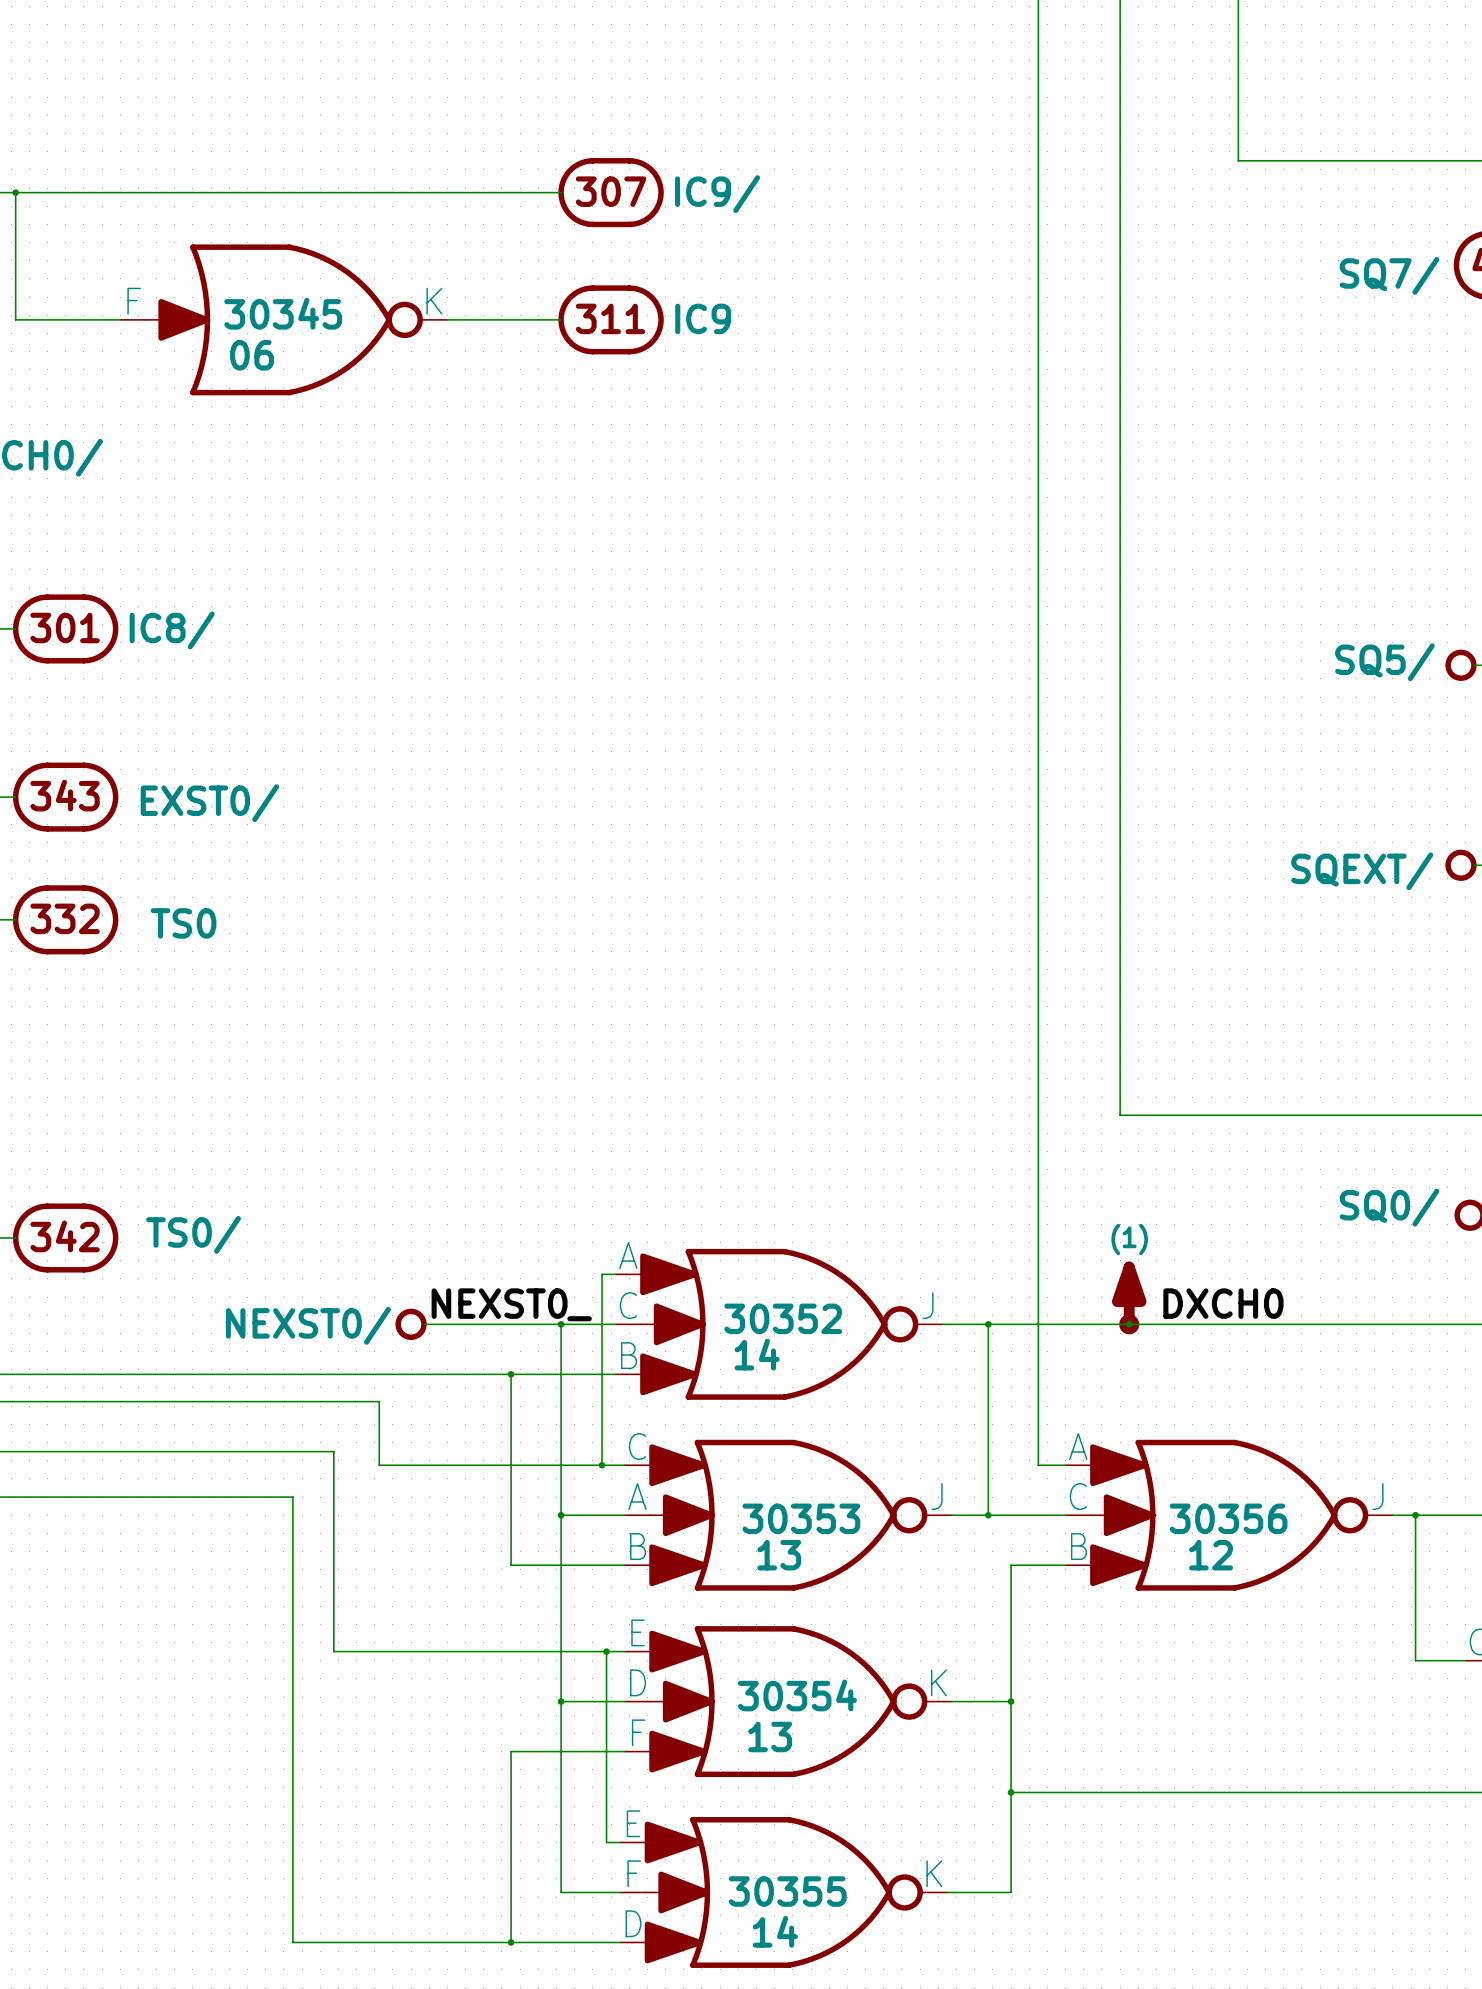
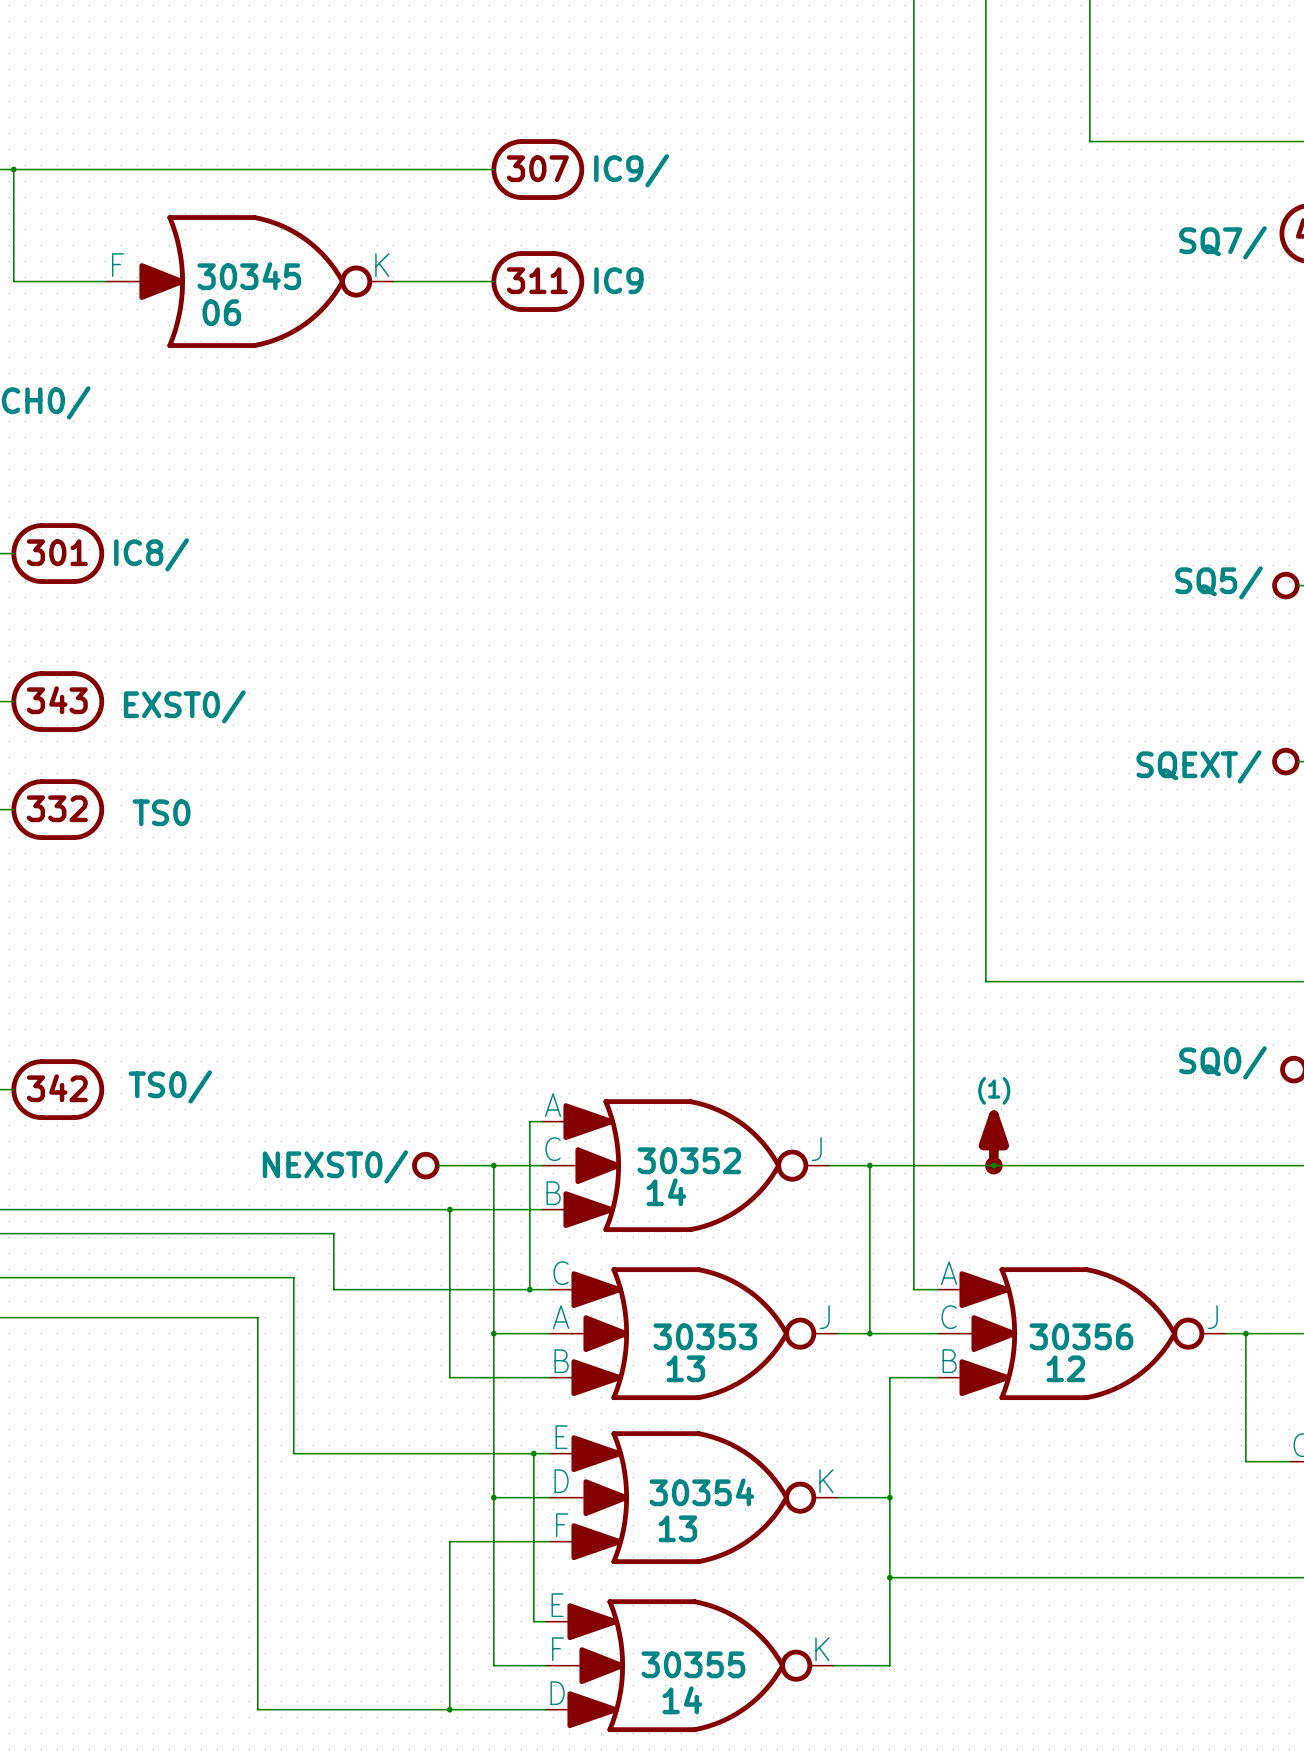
label: DXCH0 (1223, 1303) -> none
label: NEXST0_ (511, 1304) -> none
part position: (411, 1324) -> (425, 1165)
wire: (424, 1324) (497, 1324) -> none

